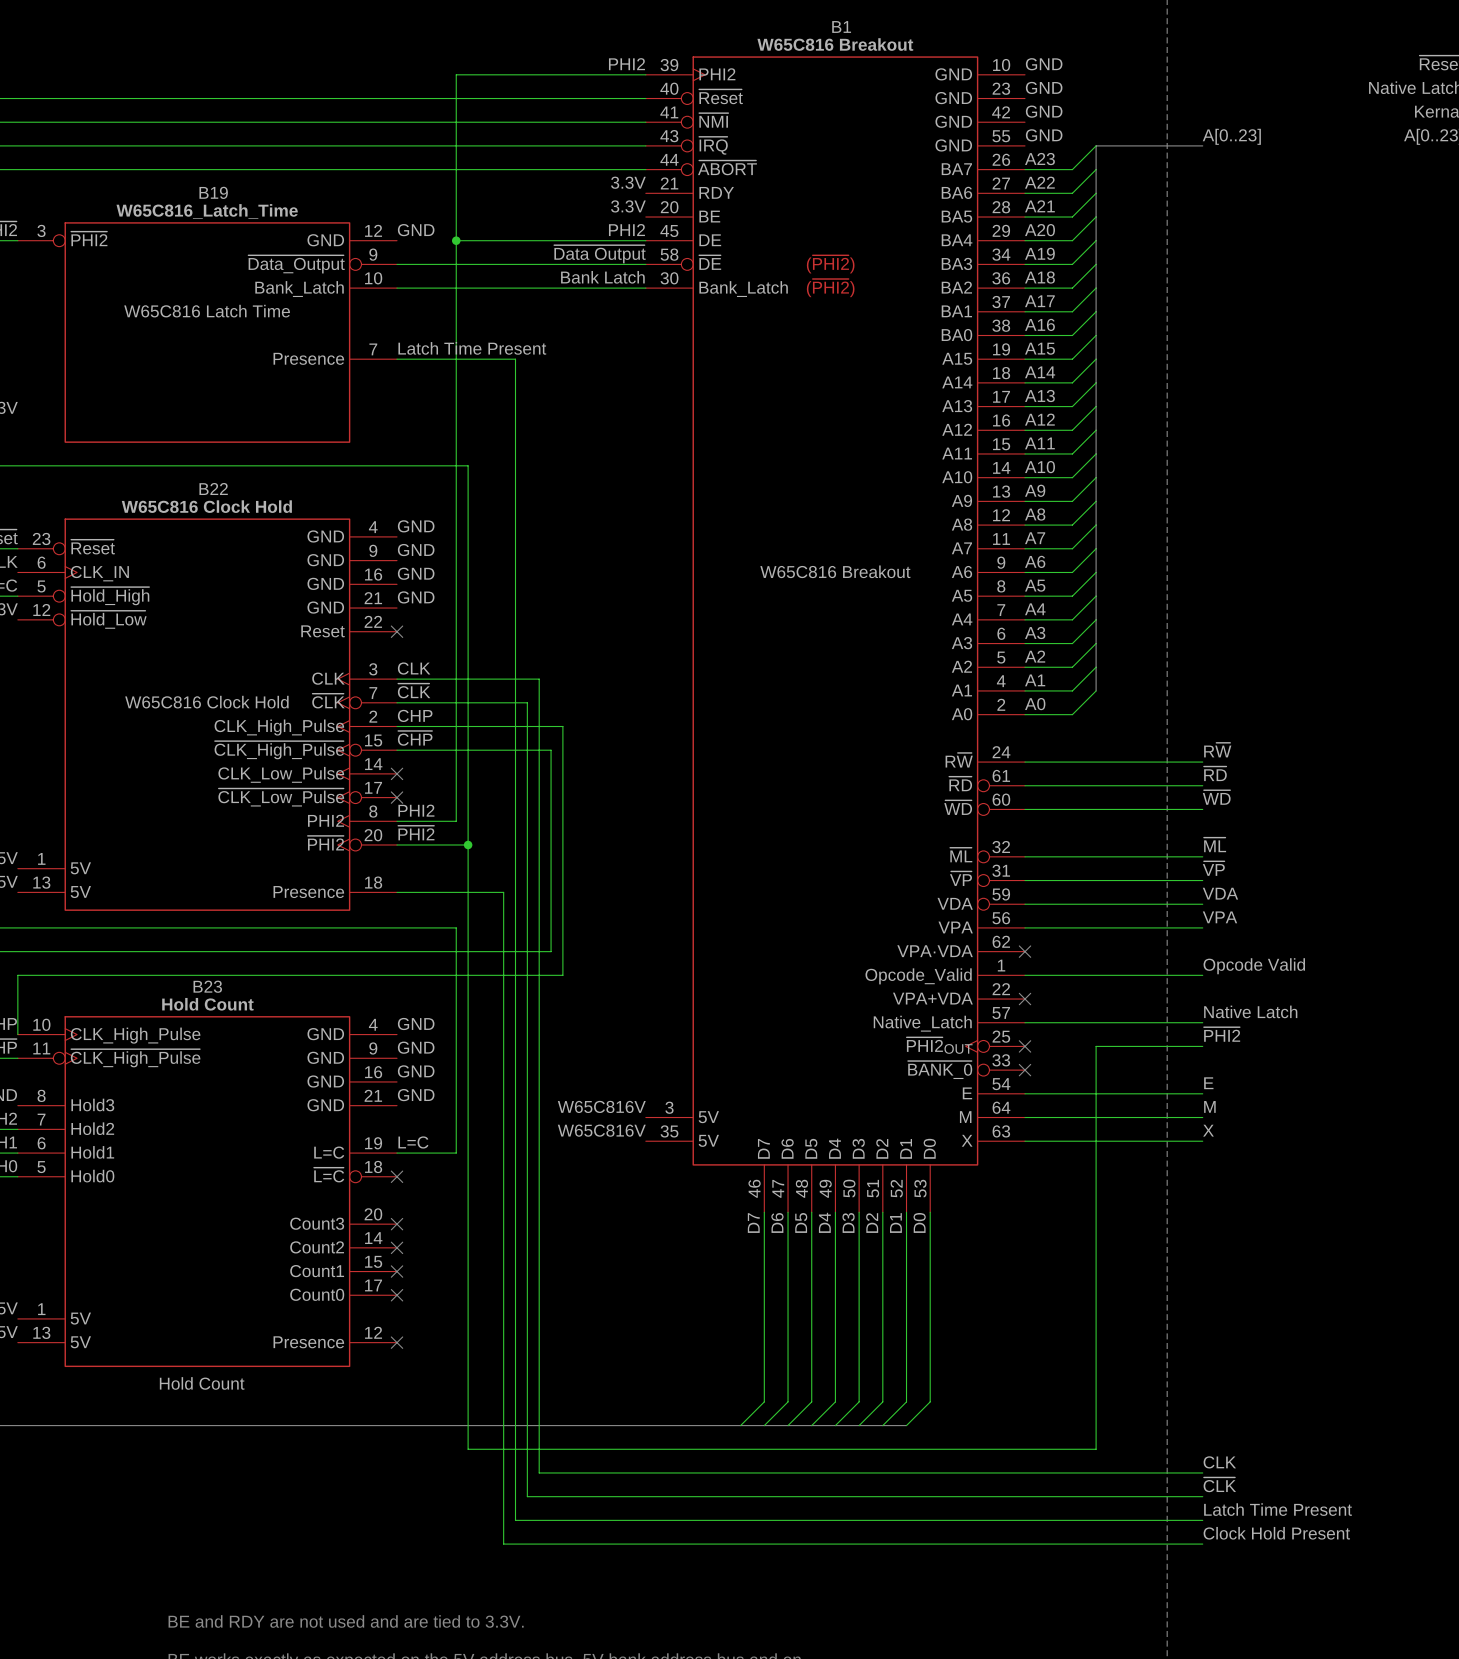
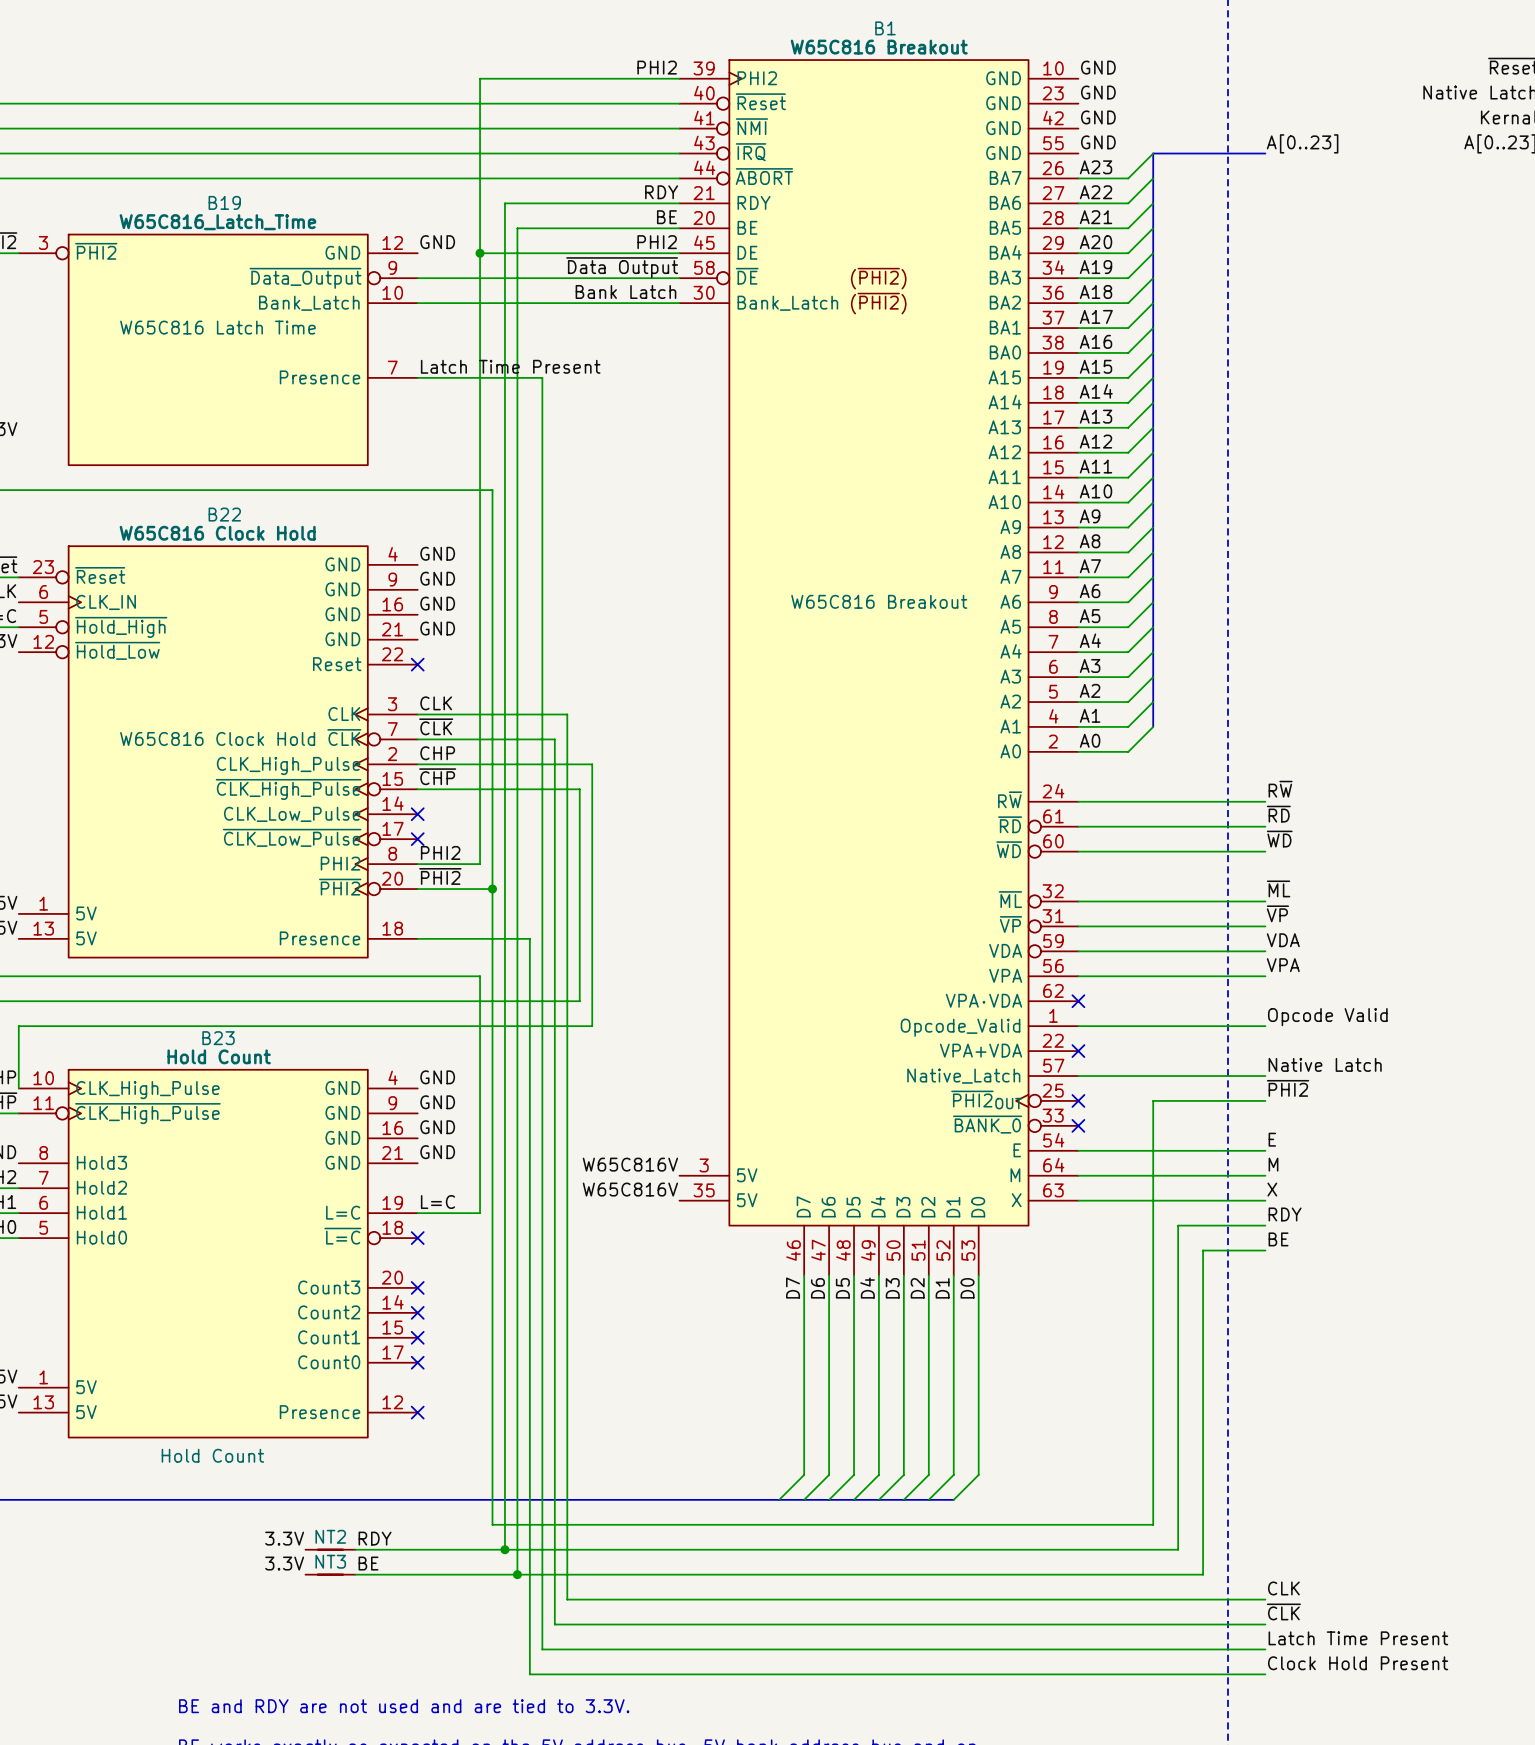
label: 3.3V (628, 182) -> RDY (661, 192)
wire: none -> (679, 203) (504, 203) (504, 1549)
label: 3.3V (628, 206) -> BE (666, 217)
wire: none -> (679, 228) (517, 228) (517, 1574)
label: none -> RDY (1285, 1214)
label: none -> BE (1278, 1239)
label: none -> 3.3V (284, 1538)
label: none -> RDY (375, 1538)
label: CLK (1219, 1462) -> none
NT2: none -> (330, 1549)
junction: none -> (504, 1549)
wire: (1119, 1472) (1202, 1472) -> (1178, 1549) (1178, 1225) (1265, 1225)
label: ~{CLK} (1219, 1484) -> none
label: none -> 3.3V (284, 1563)
label: none -> BE (368, 1563)
NT3: none -> (330, 1574)
junction: none -> (517, 1574)
wire: (1143, 1496) (1202, 1496) -> (1203, 1574) (1203, 1250) (1265, 1250)
label: Latch Time Present (1278, 1509) -> CLK (1283, 1588)
wire: (515, 1520) (539, 1520) -> (355, 1549) (567, 1549) (567, 1599)
wire: none -> (542, 1599) (542, 1649) (1265, 1649)
label: Clock Hold Present (1276, 1533) -> ~{CLK} (1283, 1611)
wire: (503, 1544) (527, 1544) -> (355, 1574) (554, 1574) (554, 1624)
wire: none -> (529, 1624) (529, 1674) (1265, 1674)
label: none -> Latch Time Present (1358, 1638)
label: none -> Clock Hold Present (1358, 1663)

